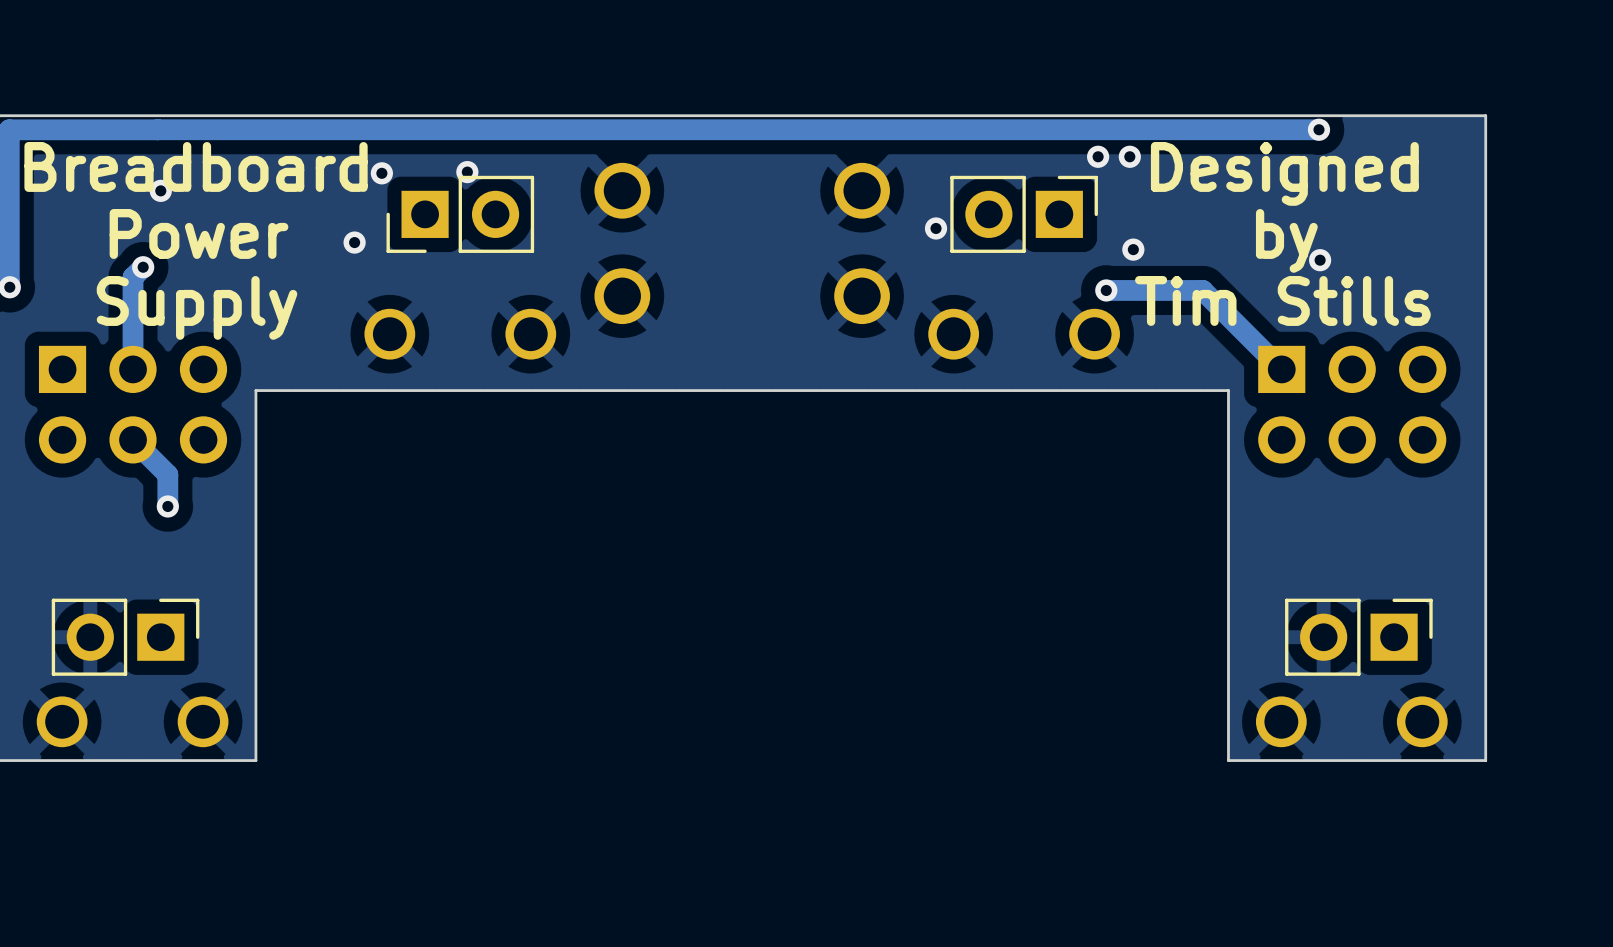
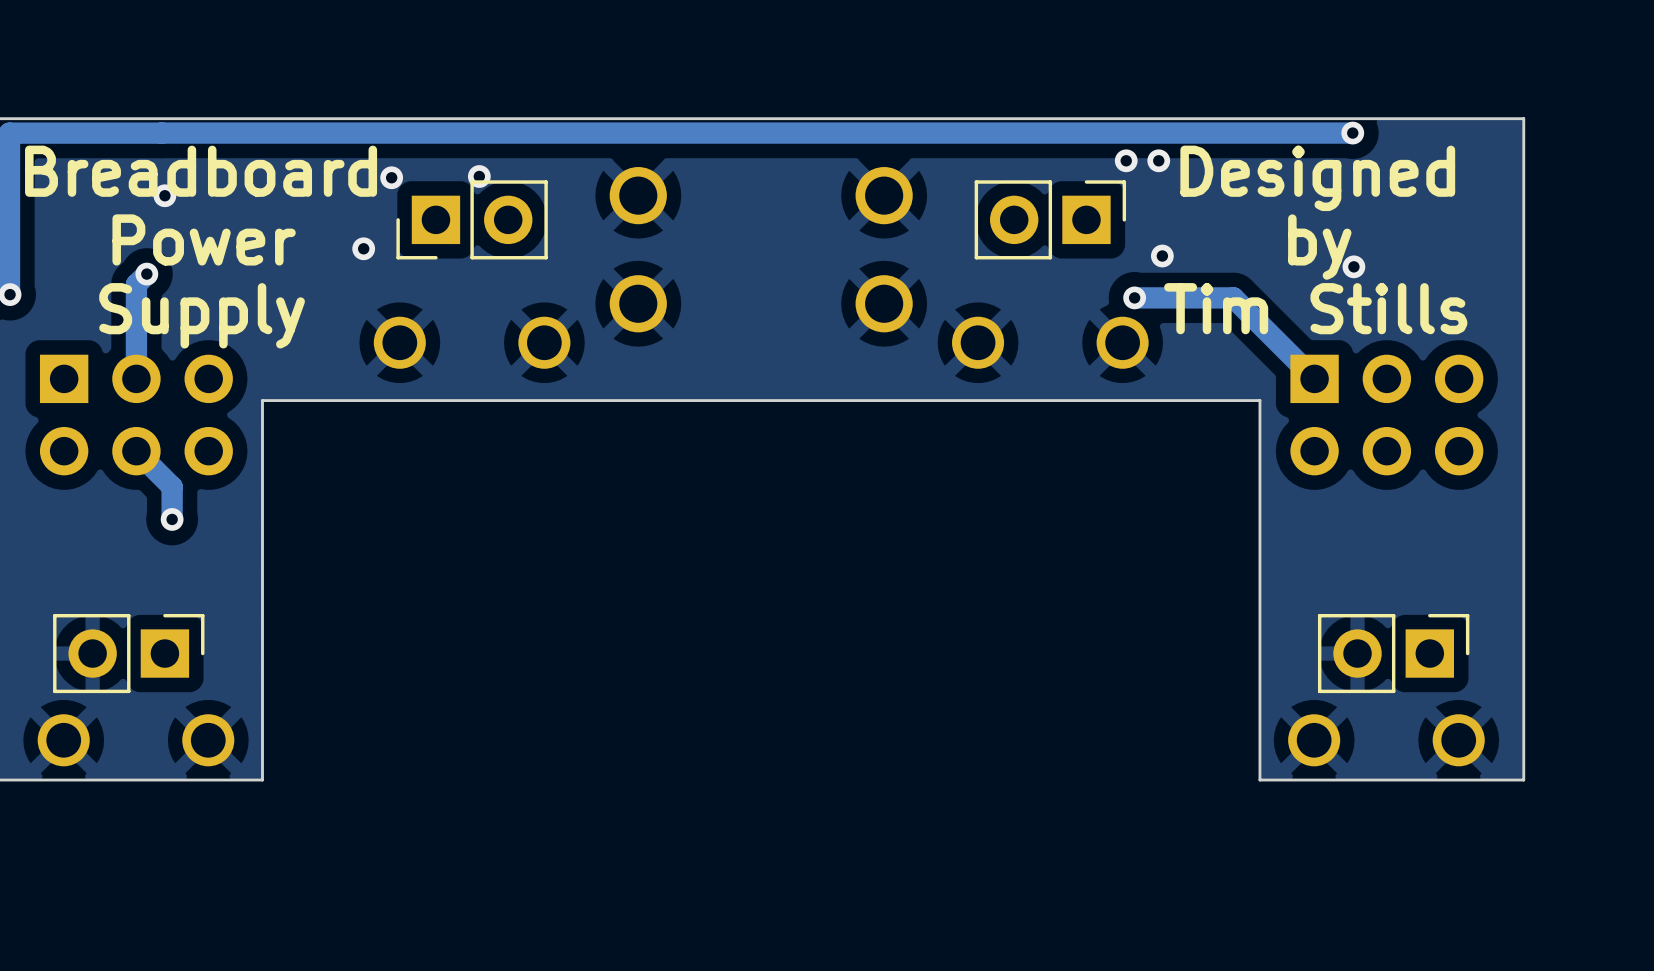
via: (936, 228) -> none

